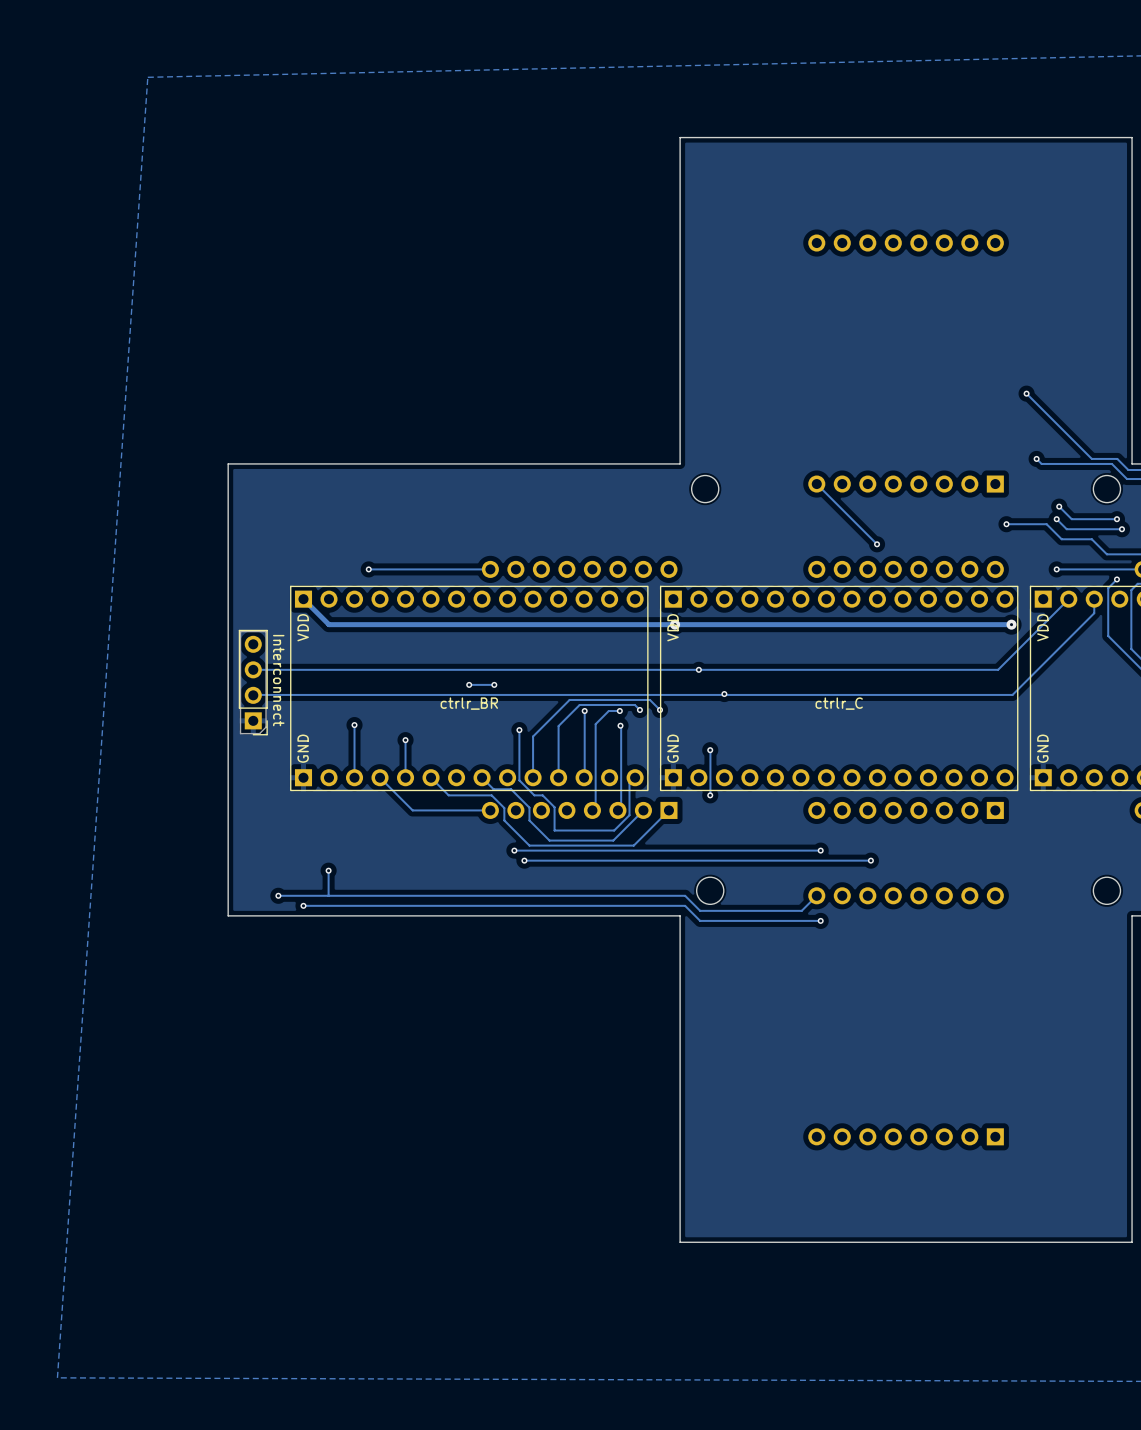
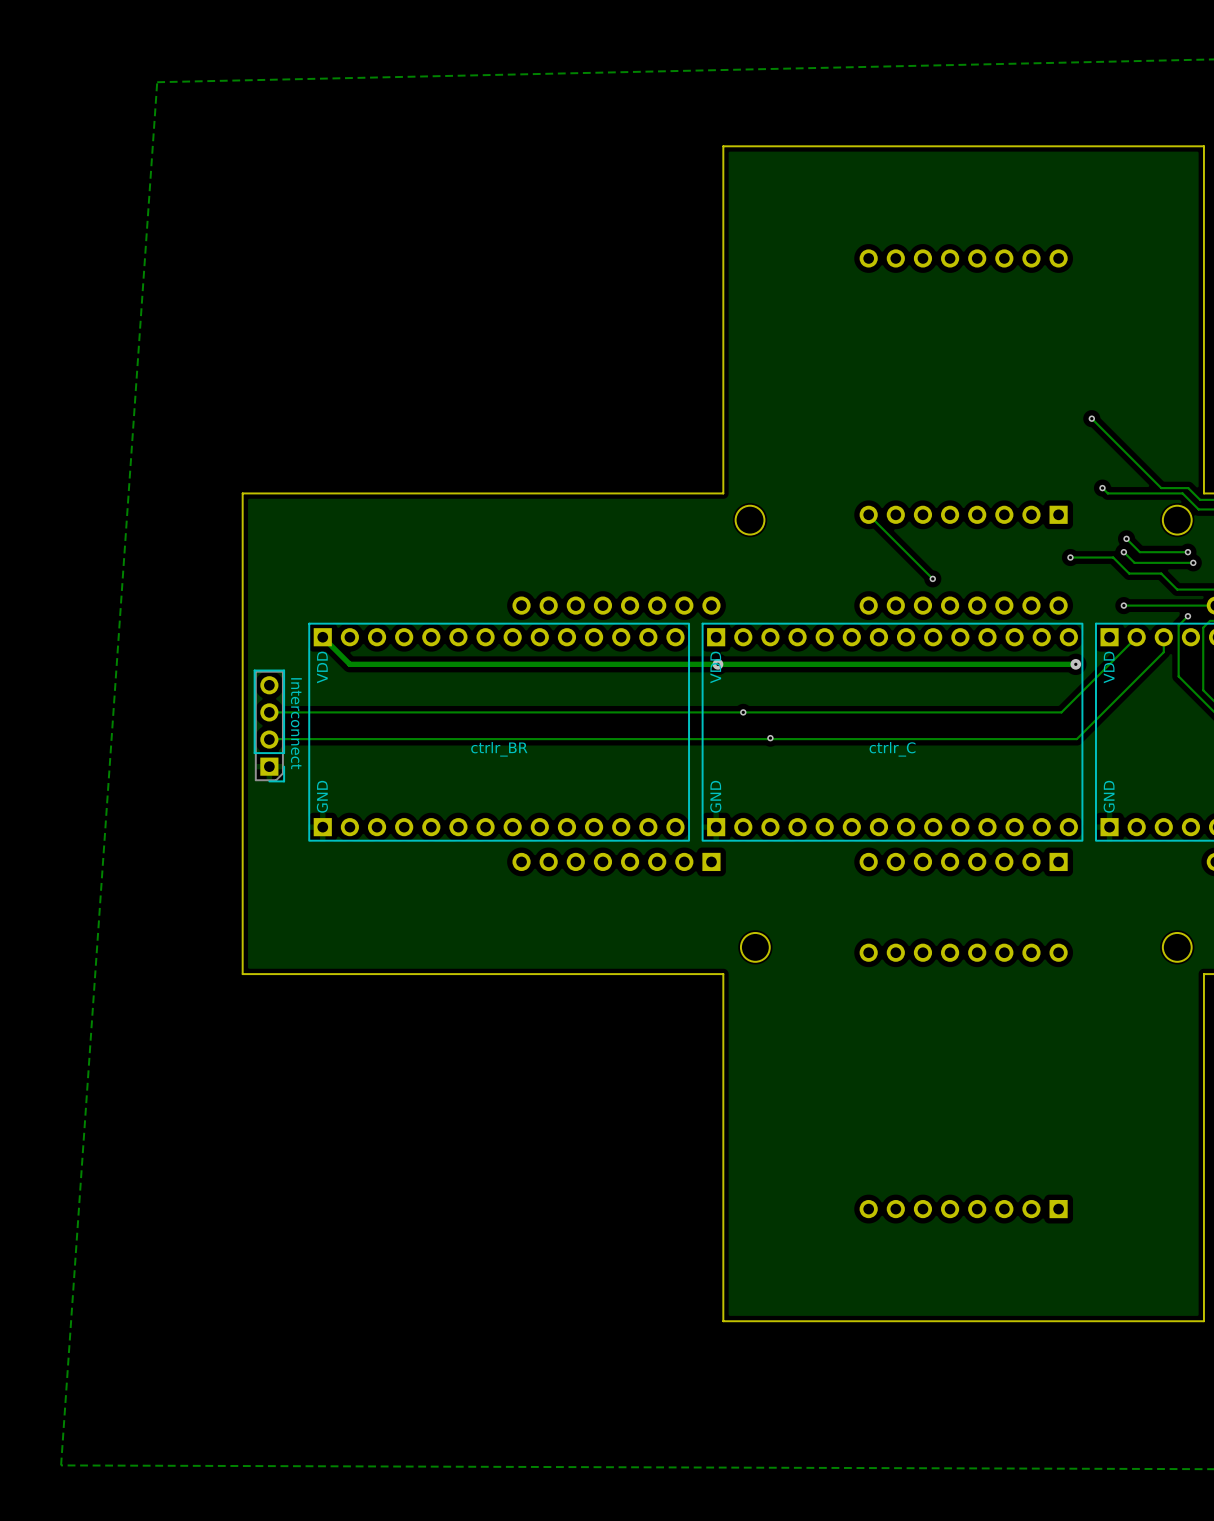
via: (368, 569) -> none
track: (490, 569) (368, 569) -> none
via: (469, 684) -> none
track: (494, 684) (469, 684) -> none
via: (494, 684) -> none
track: (639, 710) (634, 704) (579, 704) (558, 726) (558, 777) -> none
via: (639, 710) -> none
track: (660, 710) (649, 699) (569, 699) (533, 736) (533, 777) -> none
via: (660, 710) -> none
track: (584, 711) (584, 777) -> none
via: (584, 711) -> none
track: (619, 711) (608, 711) (595, 724) (595, 807) (592, 810) -> none
via: (619, 711) -> none
track: (354, 725) (354, 777) -> none
via: (354, 725) -> none
track: (620, 725) (621, 807) (617, 810) -> none
via: (620, 725) -> none
track: (519, 730) (519, 780) (534, 795) (542, 795) (554, 807) (554, 830) (614, 830) (629, 815) (629, 783) (635, 777) -> none
via: (519, 730) -> none
track: (405, 740) (405, 777) -> none
via: (405, 740) -> none
track: (710, 750) (710, 795) -> none
via: (710, 750) -> none
track: (380, 777) (412, 810) (490, 810) -> none
track: (431, 777) (448, 795) (491, 795) (504, 808) (504, 820) (529, 845) (633, 845) (668, 810) -> none
track: (482, 777) (493, 789) (511, 789) (529, 807) (529, 820) (549, 840) (613, 840) (643, 810) -> none
via: (710, 795) -> none
via: (514, 850) -> none
track: (820, 850) (514, 850) -> none
via: (820, 850) -> none
via: (524, 860) -> none
track: (870, 860) (524, 860) -> none
via: (870, 860) -> none
track: (328, 870) (328, 895) -> none
via: (328, 870) -> none
via: (278, 895) -> none
track: (816, 895) (801, 910) (700, 910) (685, 895) (278, 895) -> none
track: (303, 905) (685, 905) (700, 920) (820, 920) -> none
via: (303, 905) -> none
via: (820, 920) -> none

